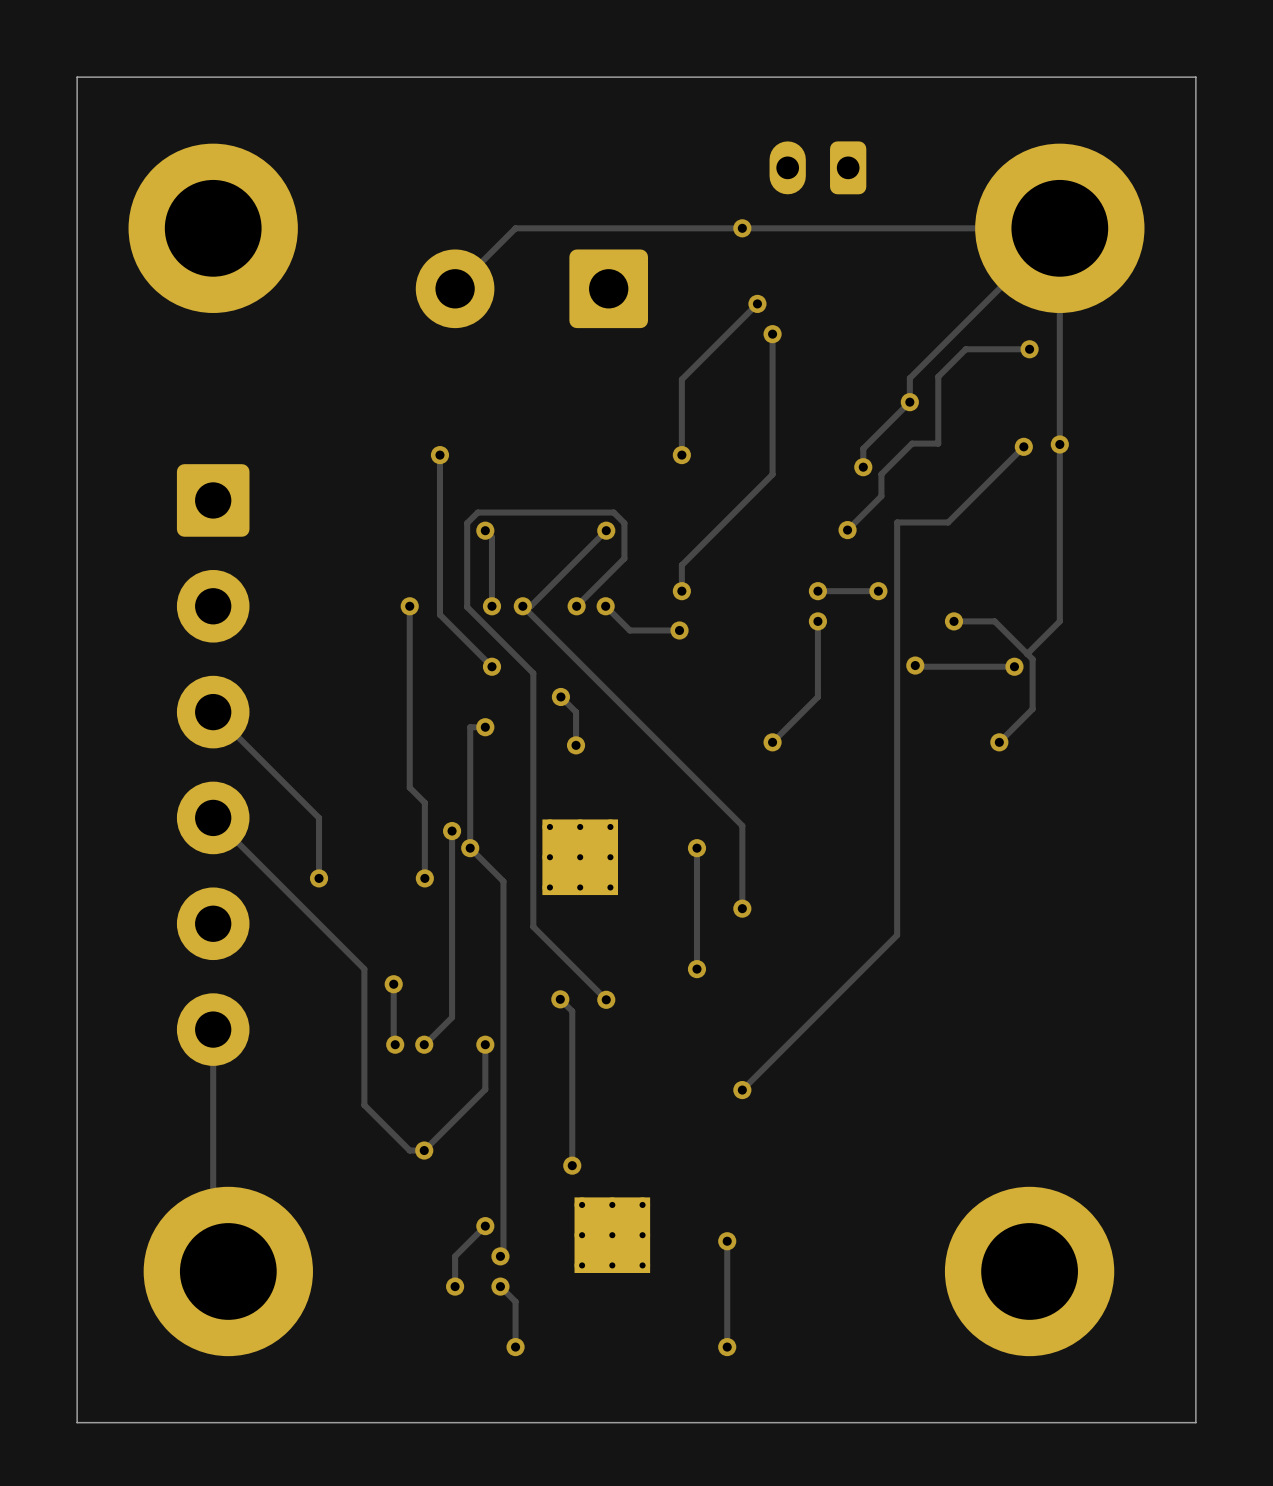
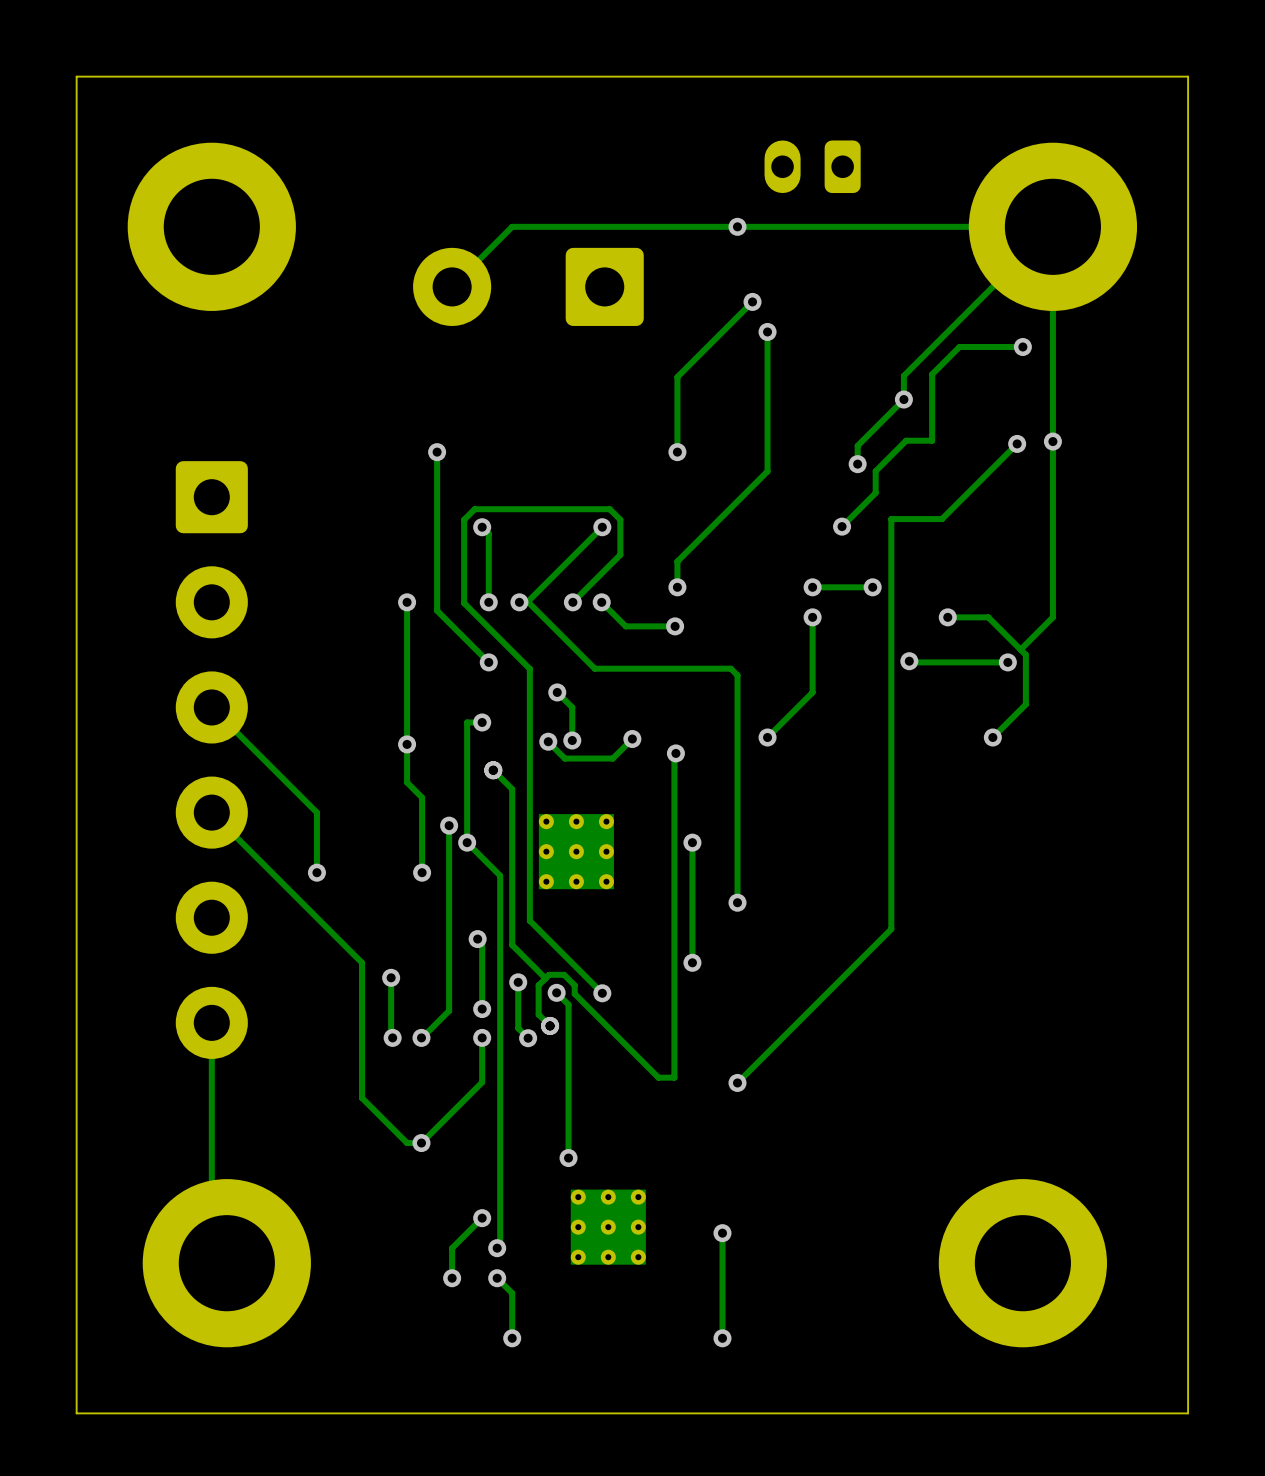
track: (522, 606) (742, 825) -> (527, 602) (594, 668) (730, 668) (737, 675) (737, 820)
track: none -> (632, 739) (612, 758) (564, 758) (548, 741)
via: none -> (632, 739)
via: none -> (548, 741)
via: none -> (407, 744)
track: none -> (675, 753) (674, 1077) (658, 1077) (574, 993) (574, 985) (564, 974) (549, 974) (538, 985) (538, 1014) (550, 1025)
via: none -> (675, 753)
track: none -> (493, 770) (512, 789) (512, 945) (545, 978)
via: none -> (493, 770)
track: none -> (477, 939) (482, 943) (482, 1009)
via: none -> (477, 939)
track: none -> (518, 982) (518, 1028) (528, 1038)
via: none -> (518, 982)
via: none -> (482, 1009)
via: none -> (550, 1025)
via: none -> (528, 1038)

